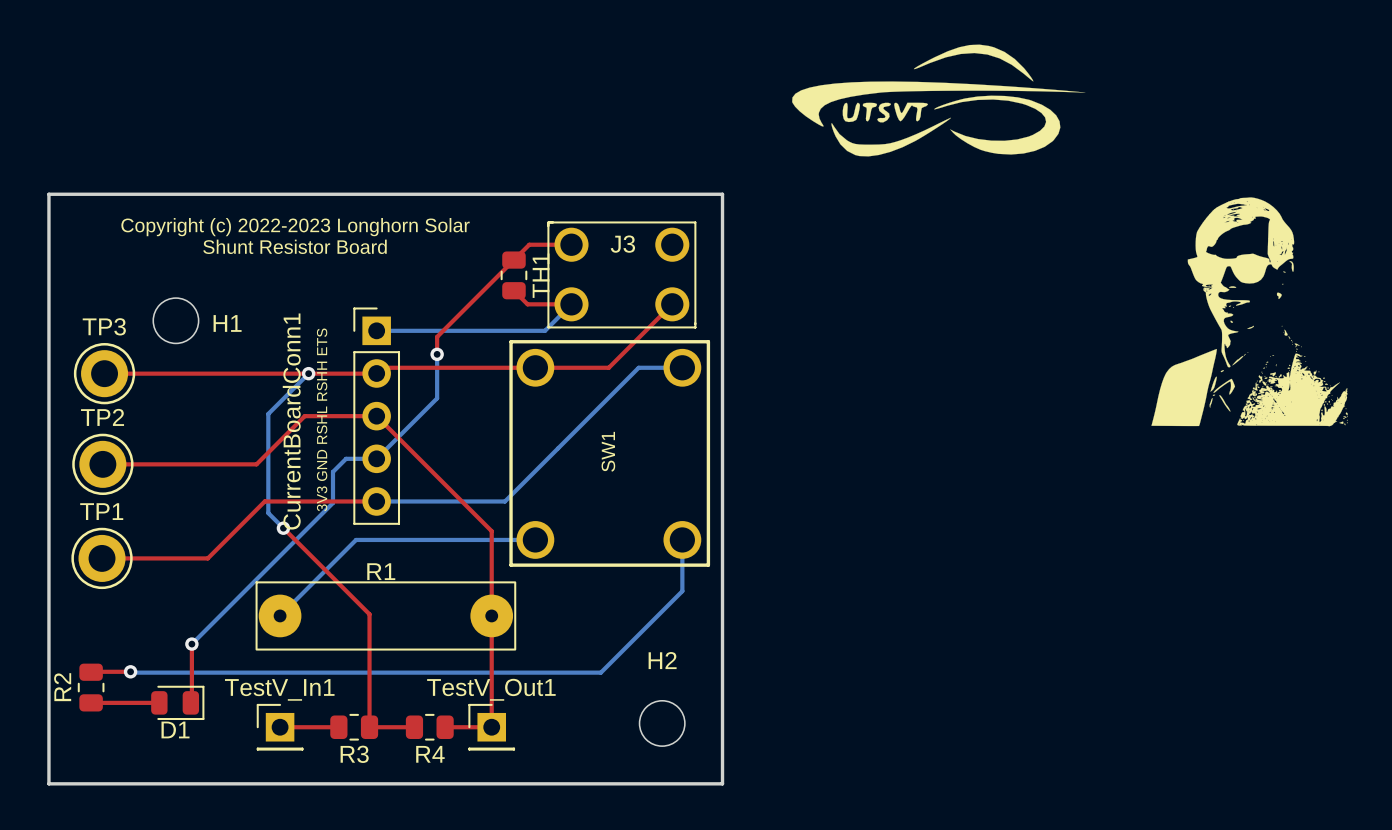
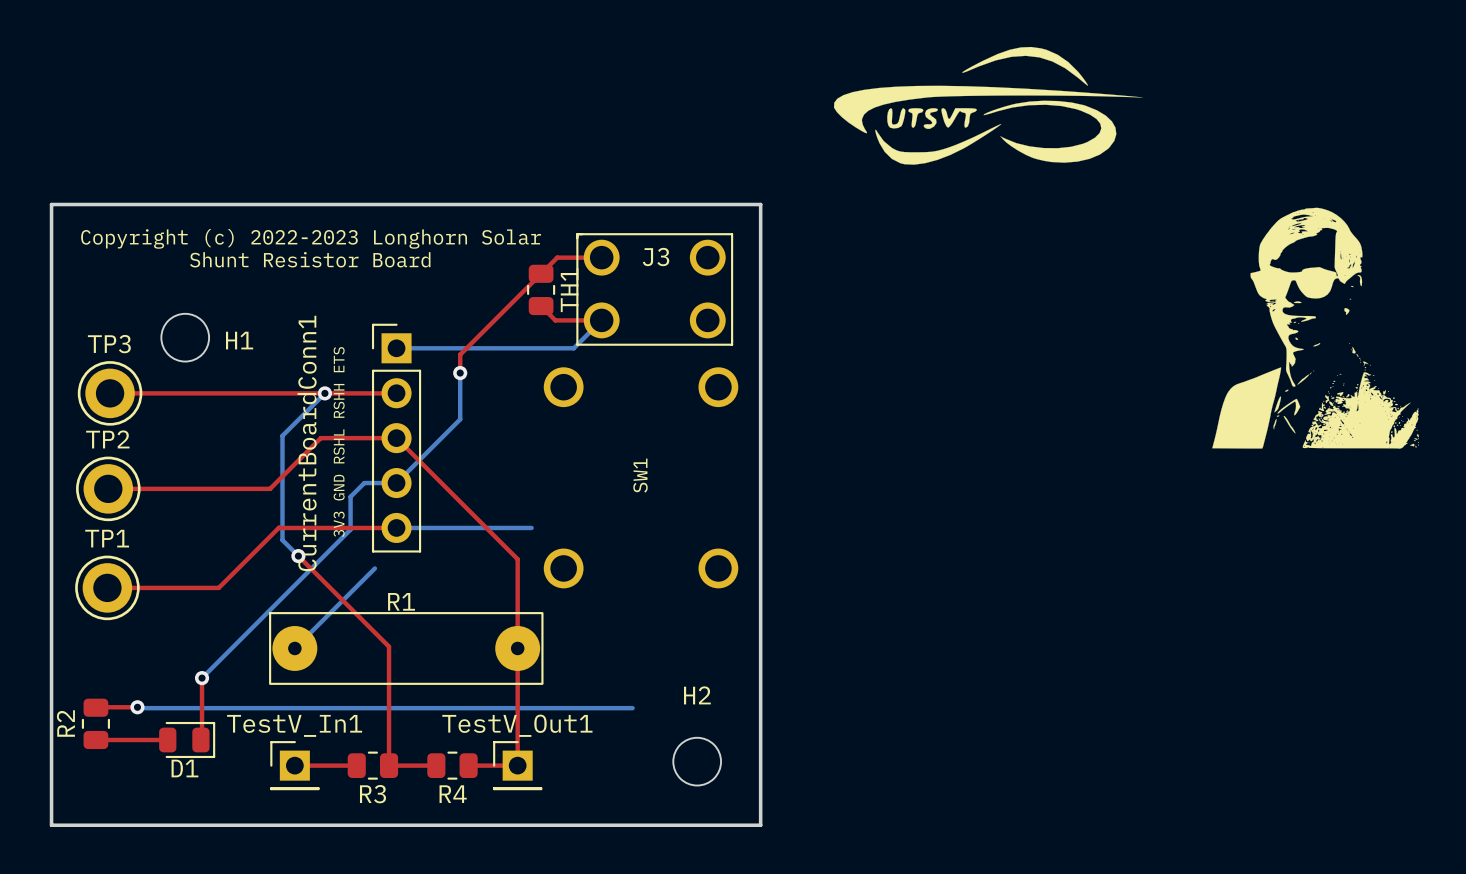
top track: (672, 304) (608, 367) (382, 367) -> none
line: (511, 341) (708, 341) (708, 565) (511, 565) (511, 341) -> none
bottom track: (682, 367) (638, 367) (504, 501) -> none
bottom track: (356, 539) (535, 539) -> none
bottom track: (682, 539) (682, 591) (600, 672) -> none

